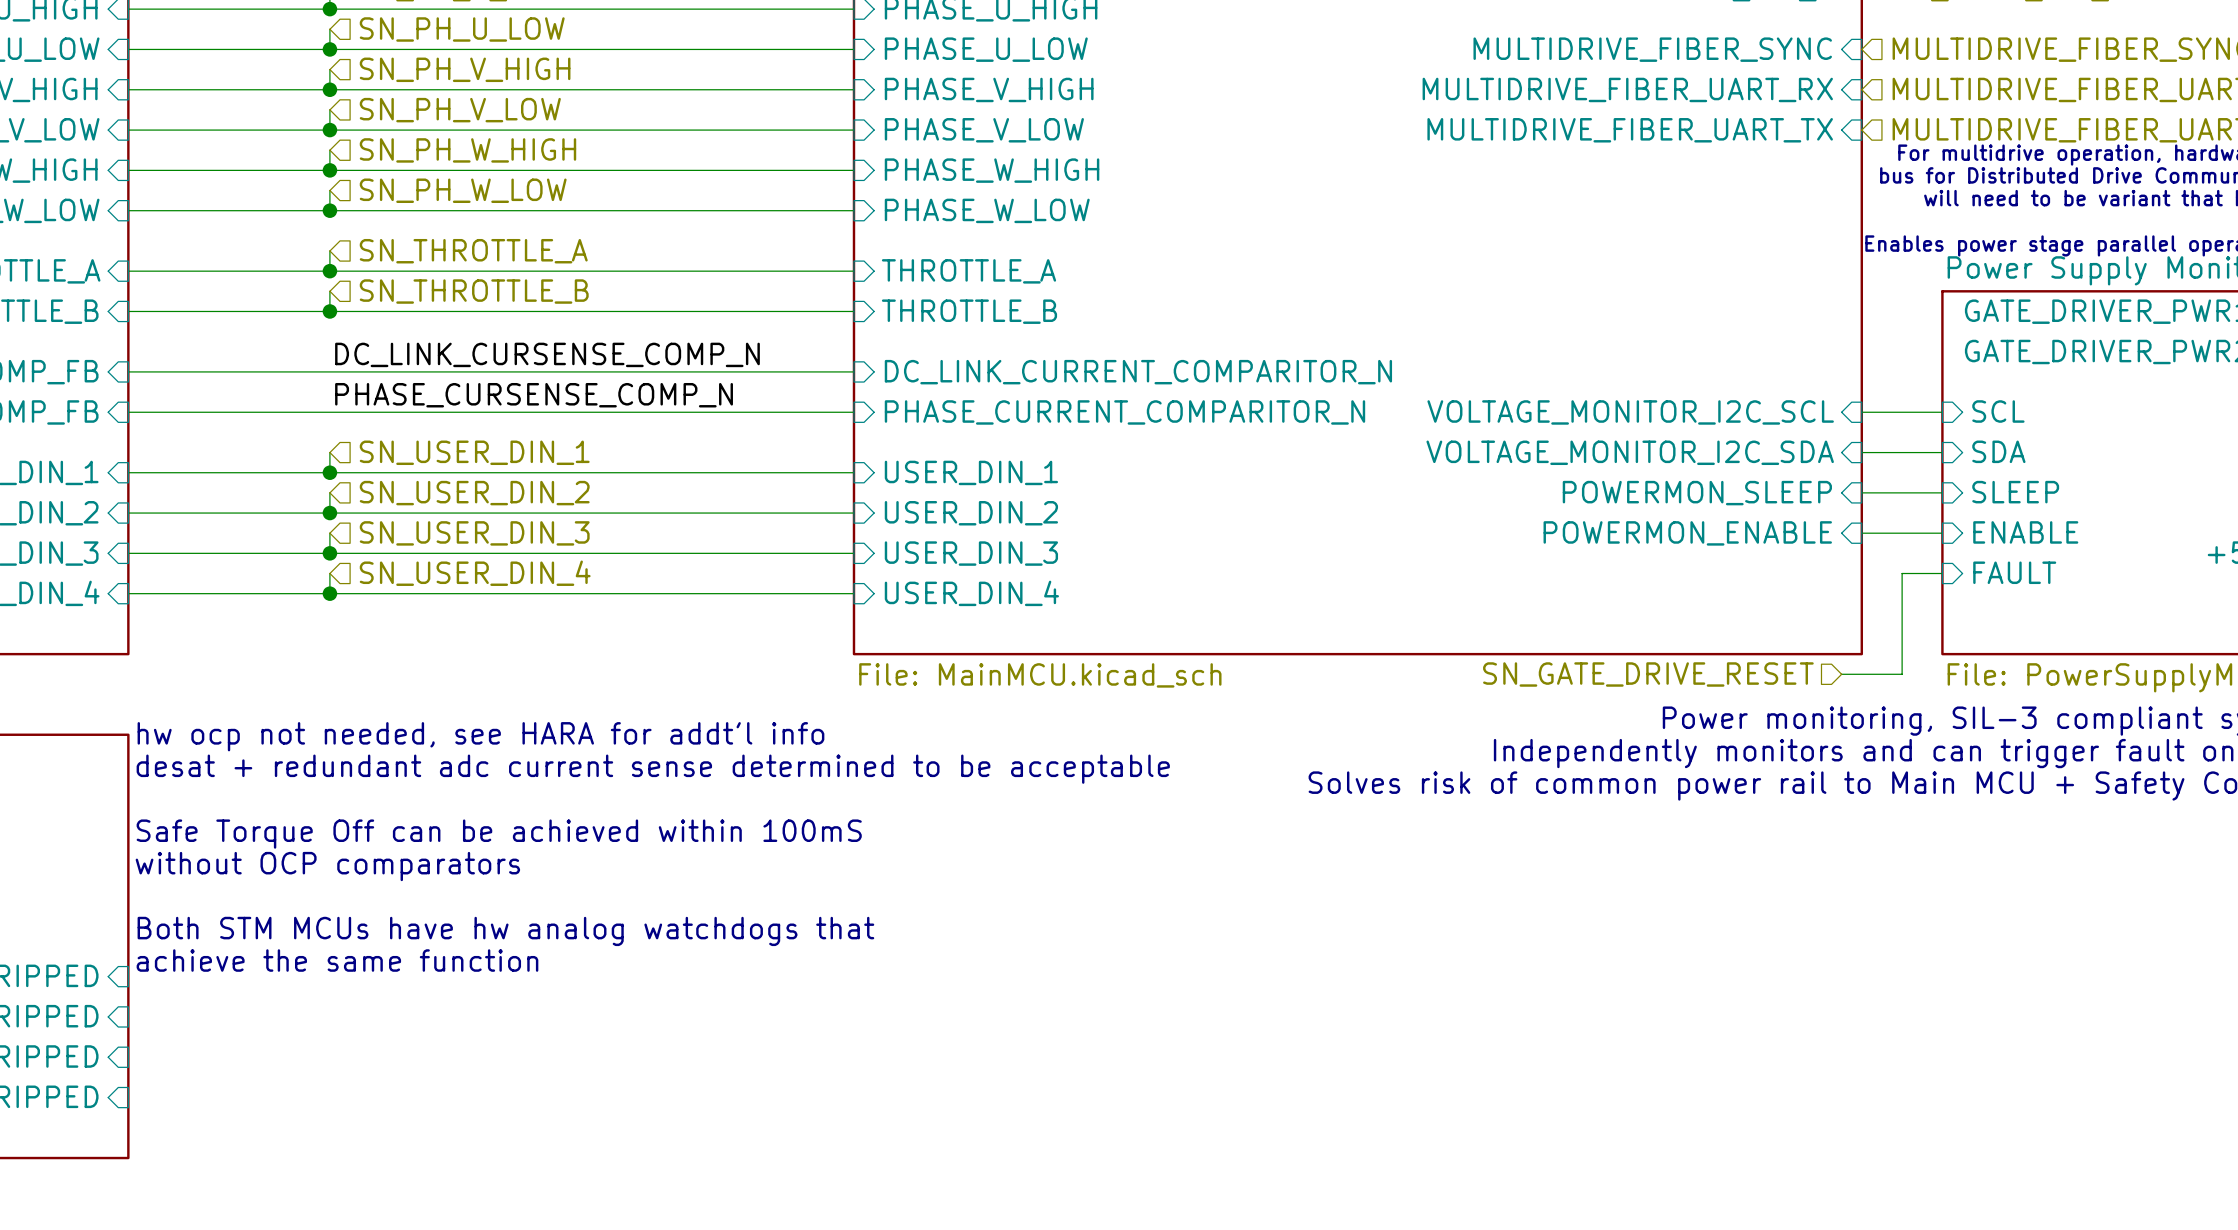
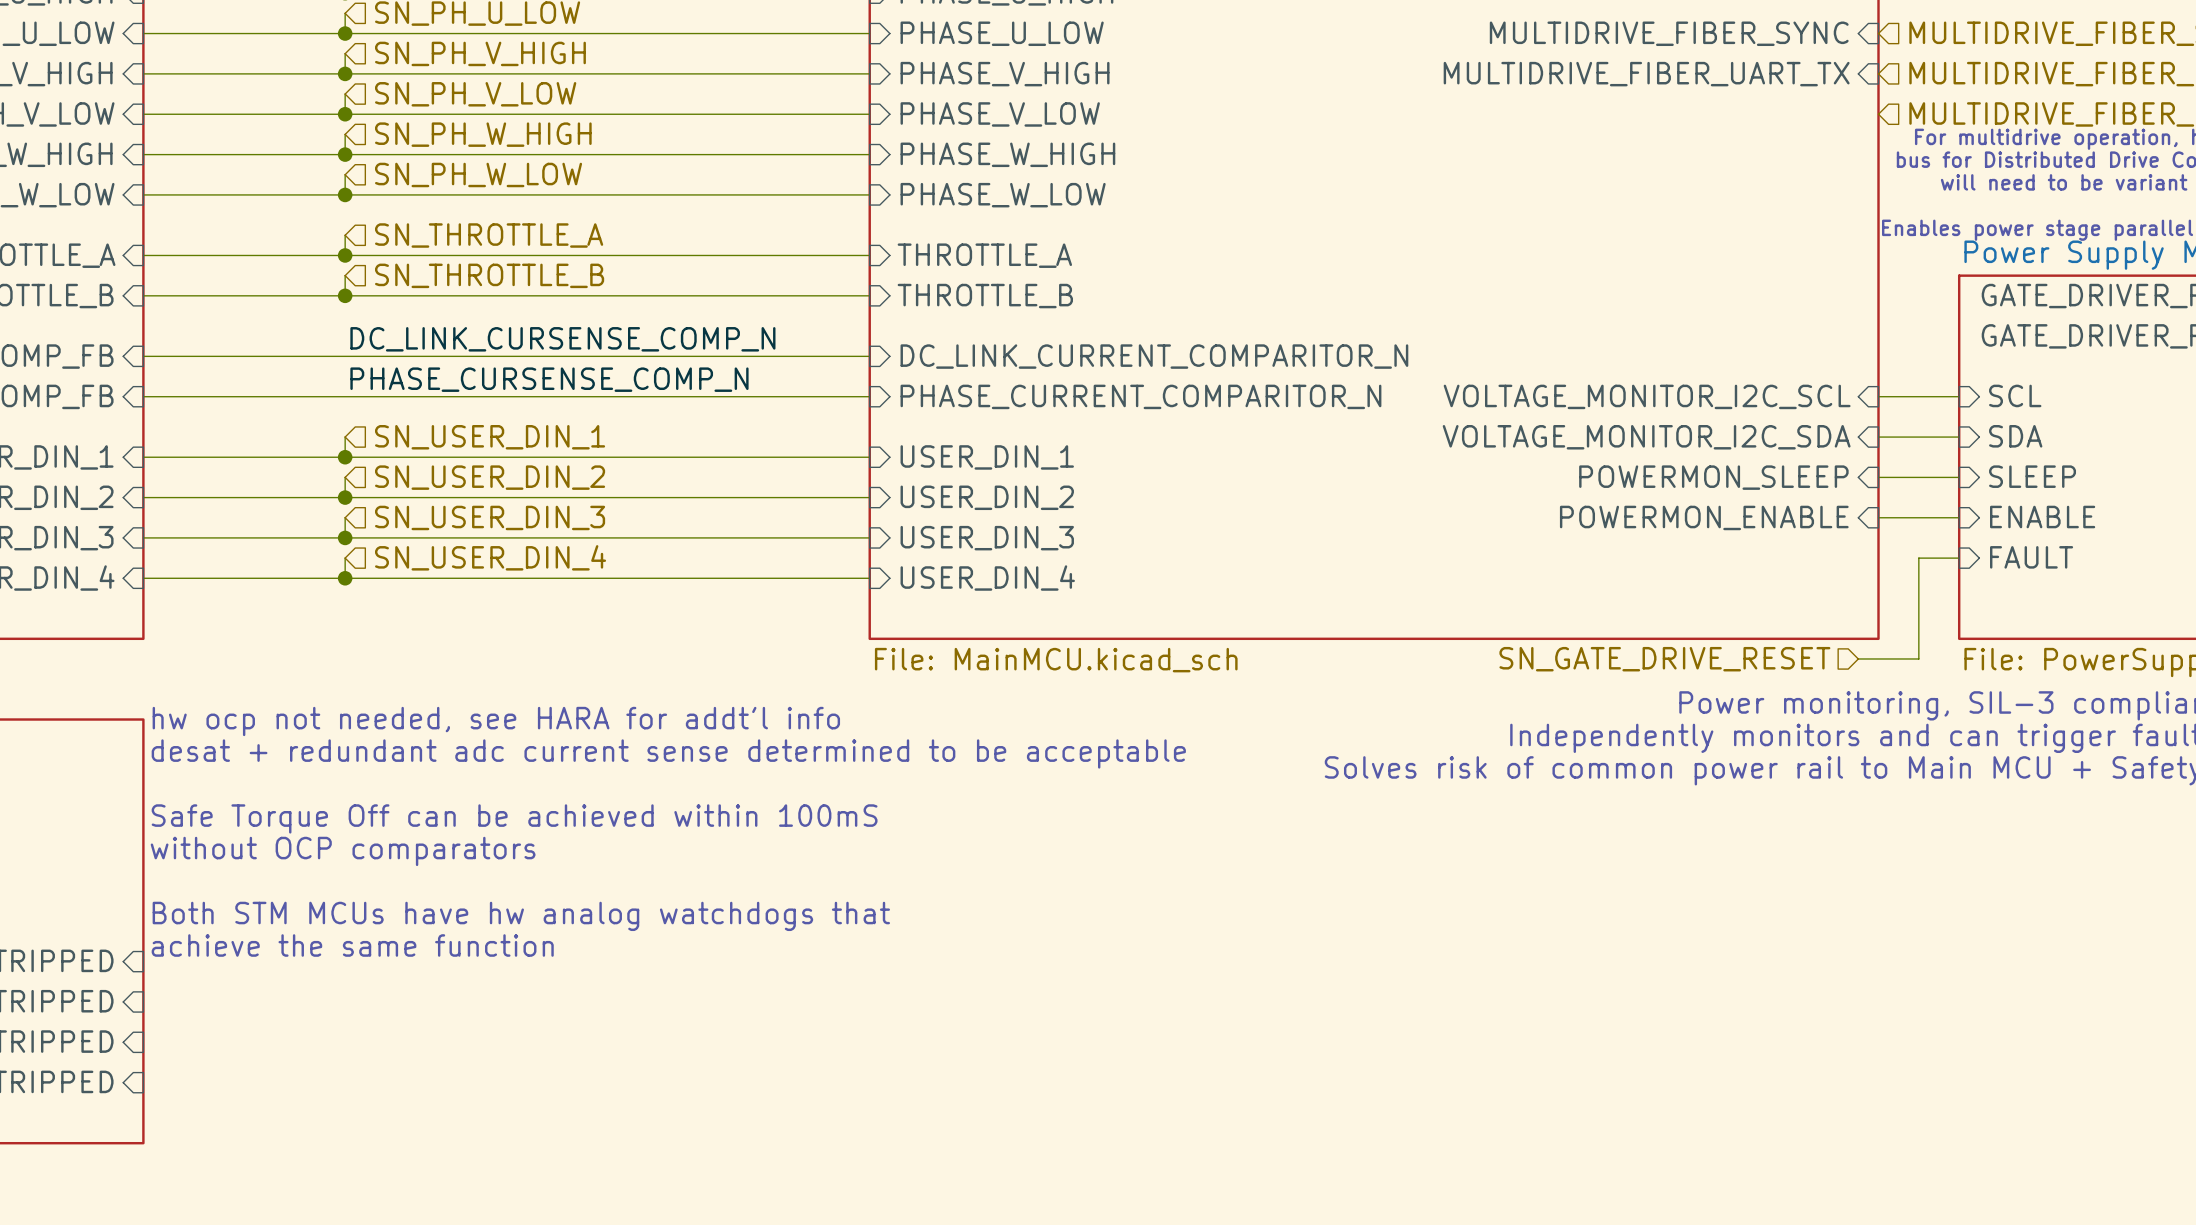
sheet pin: MULTIDRIVE_FIBER_UART_RX (1627, 89) -> MULTIDRIVE_FIBER_UART_TX (1646, 74)
sheet pin: MULTIDRIVE_FIBER_UART_TX (1630, 130) -> none

